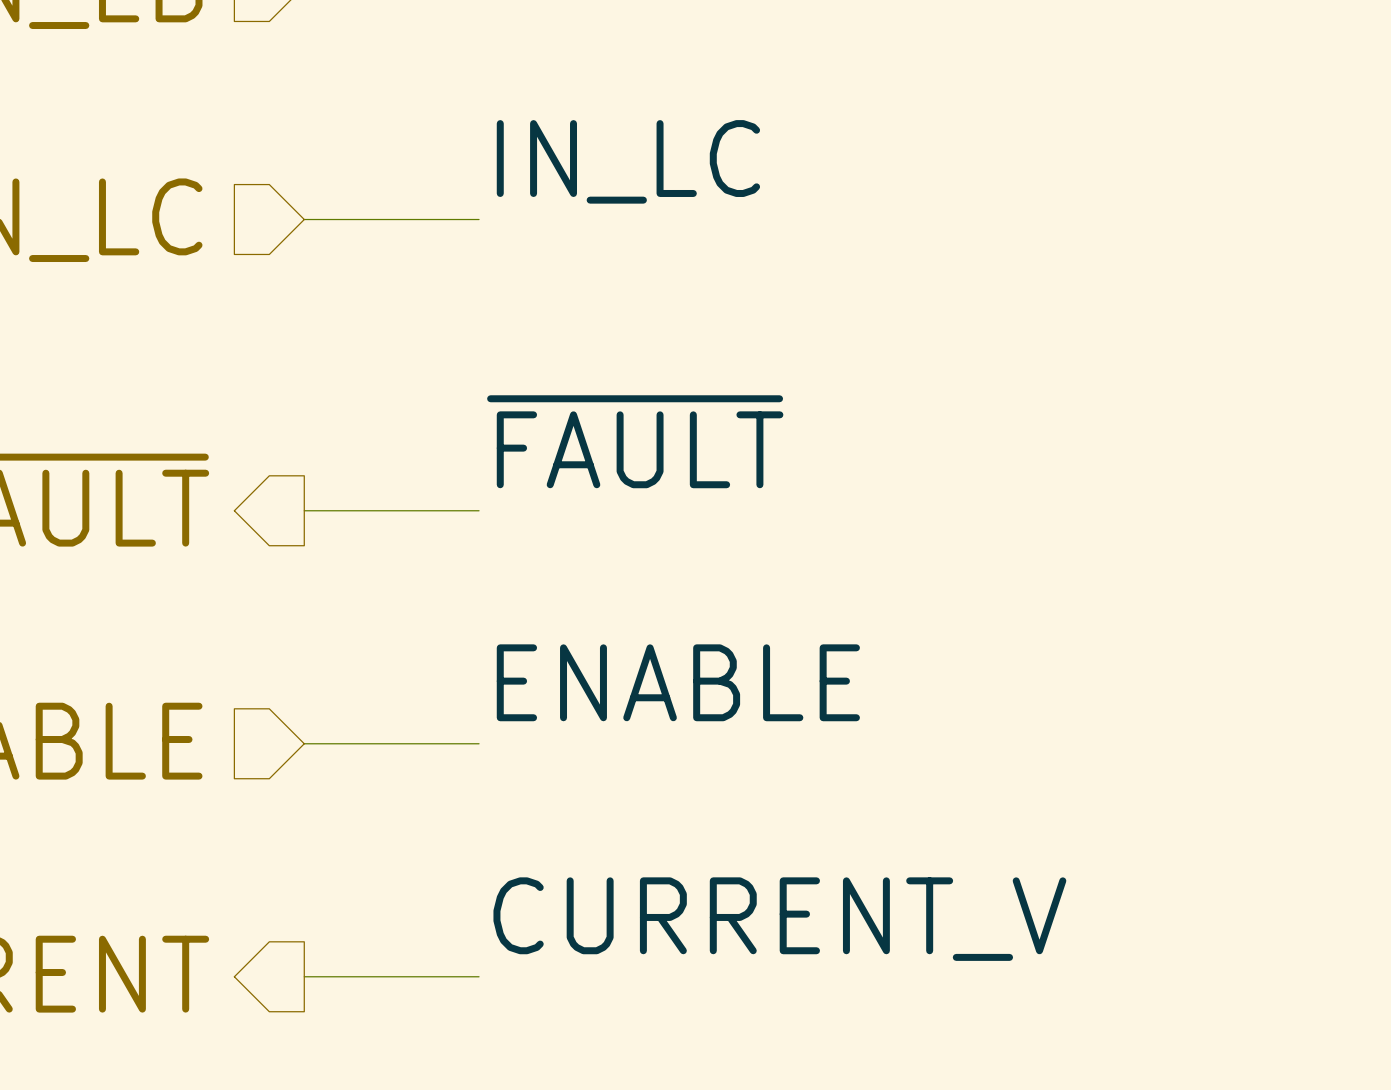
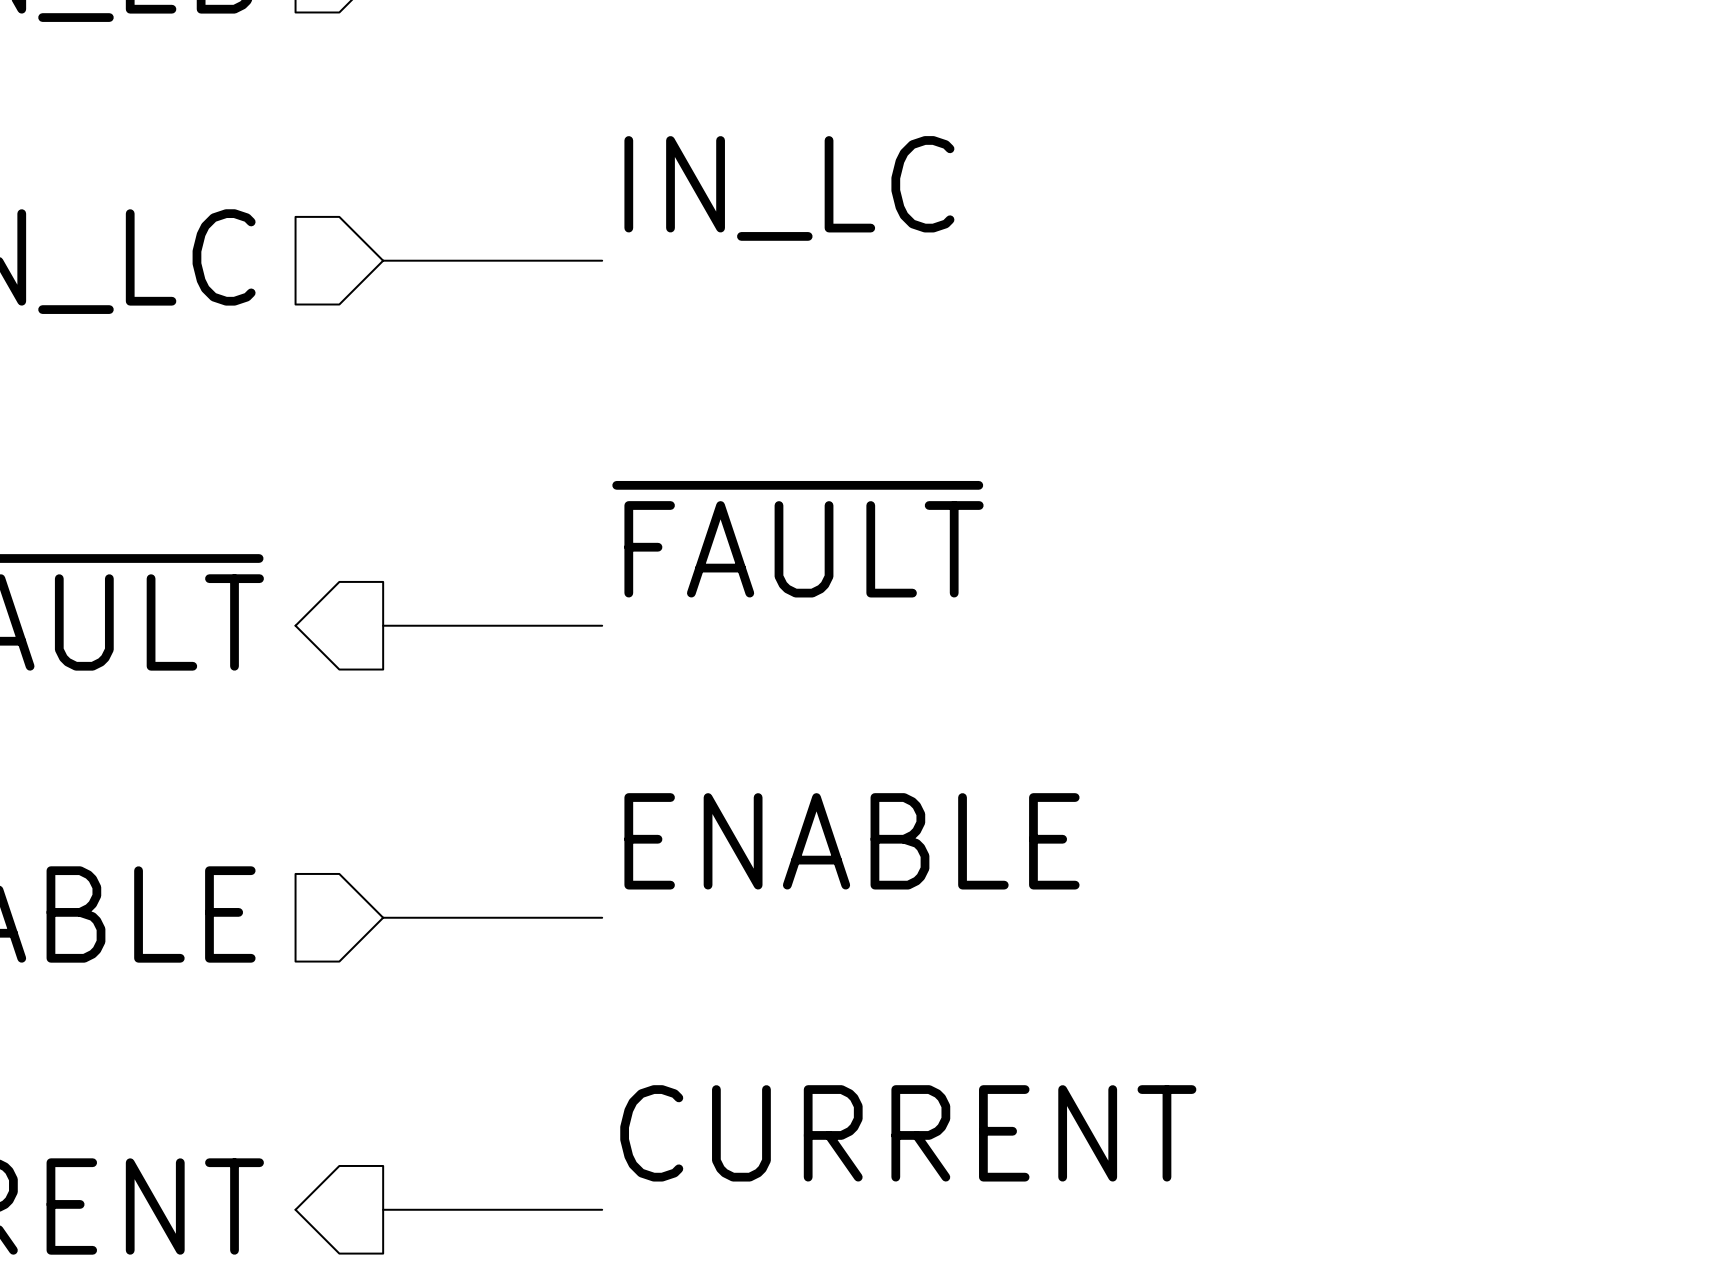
label: CURRENT_V (779, 919) -> CURRENT (908, 1133)

